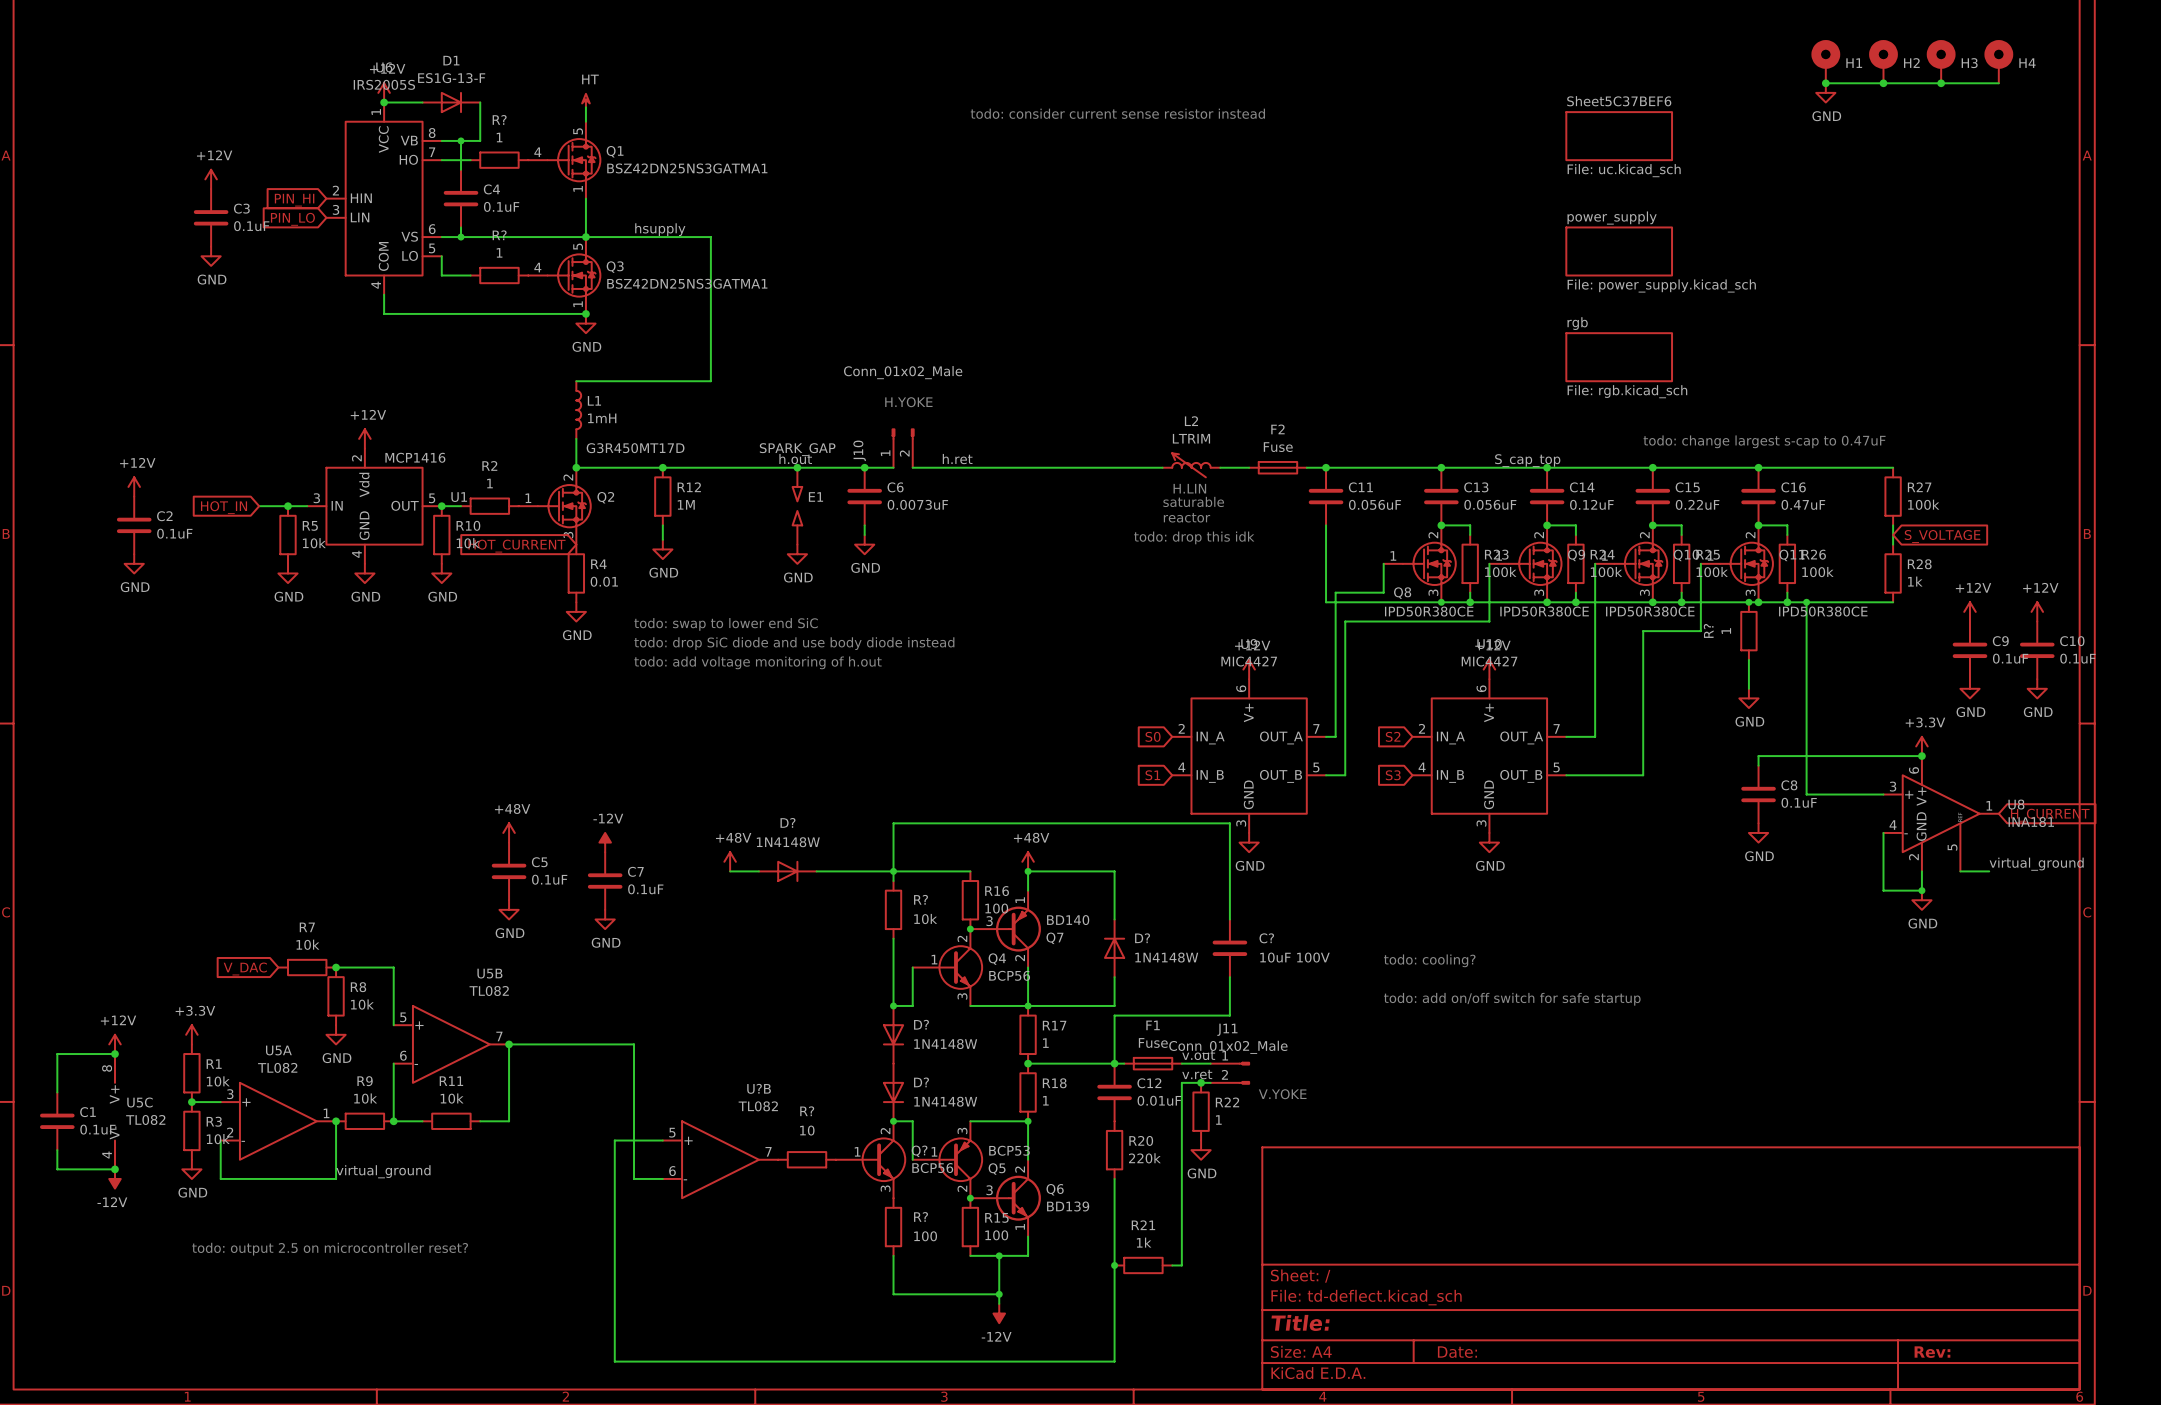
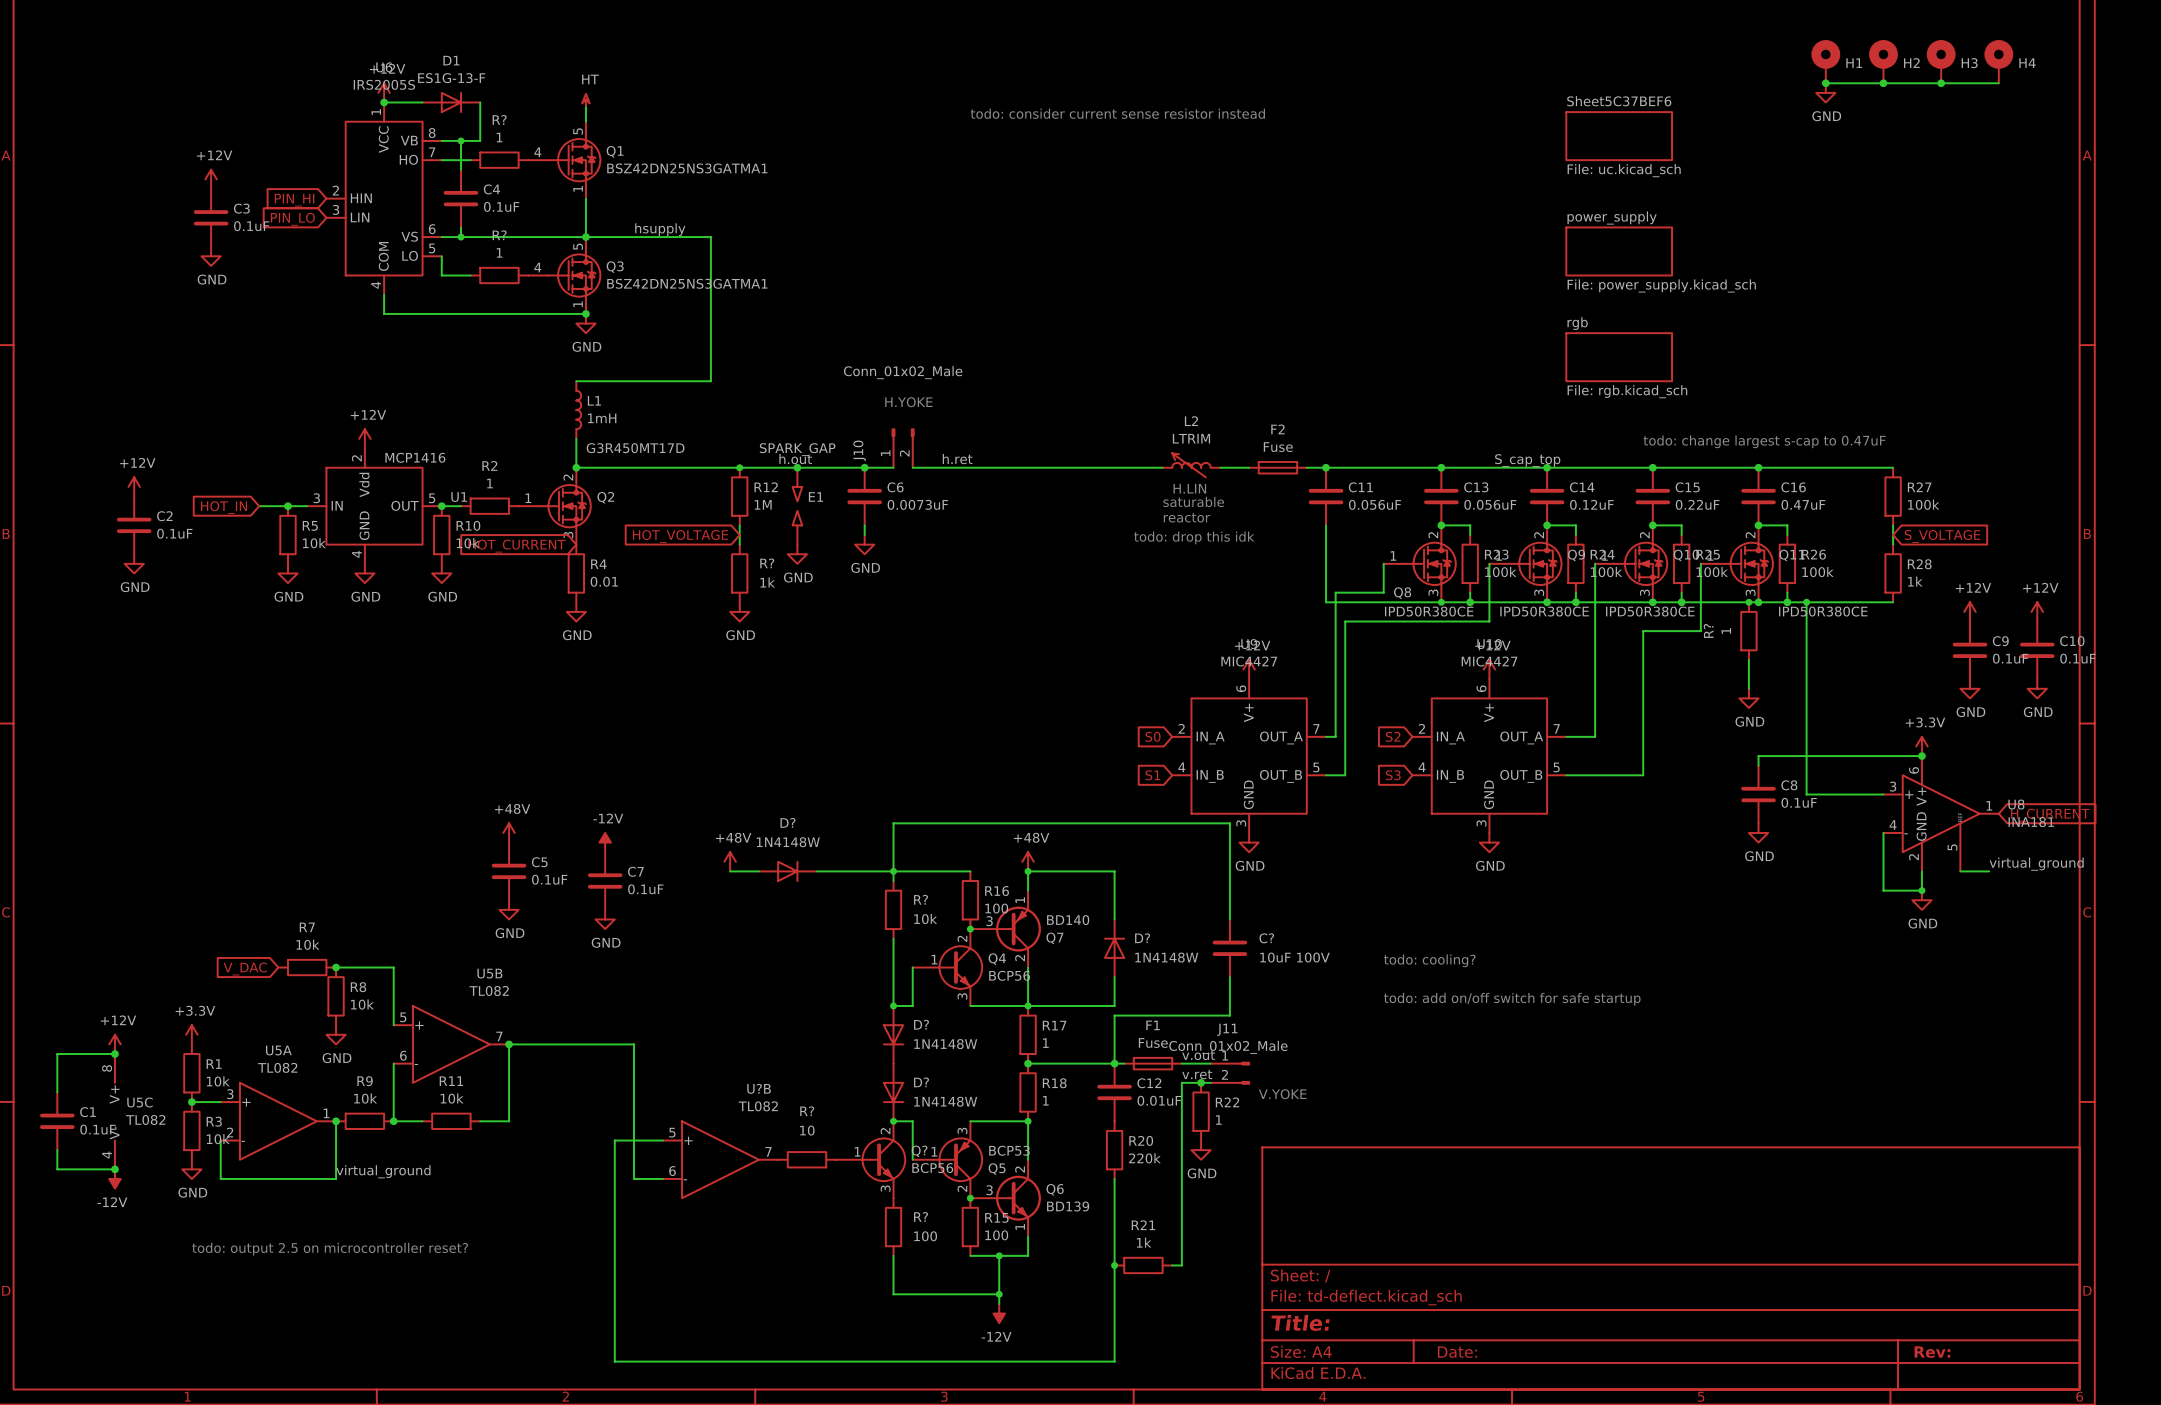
junction: (662, 467) -> none
junction: none -> (739, 467)
R12 position: (662, 496) -> (739, 496)
wire: (662, 525) (662, 539) -> none
wire: none -> (739, 525) (739, 544)
global label: none -> HOT_VOLTAGE (680, 536)
power symbol position: GND (662, 549) -> GND (739, 611)
R?: none -> 1k (739, 573)
text: todo: swap to lower end SiC (726, 624) -> none
text: todo: drop SiC diode and use body diode instead (794, 643) -> none
text: todo: add voltage monitoring of h.out (758, 662) -> none

